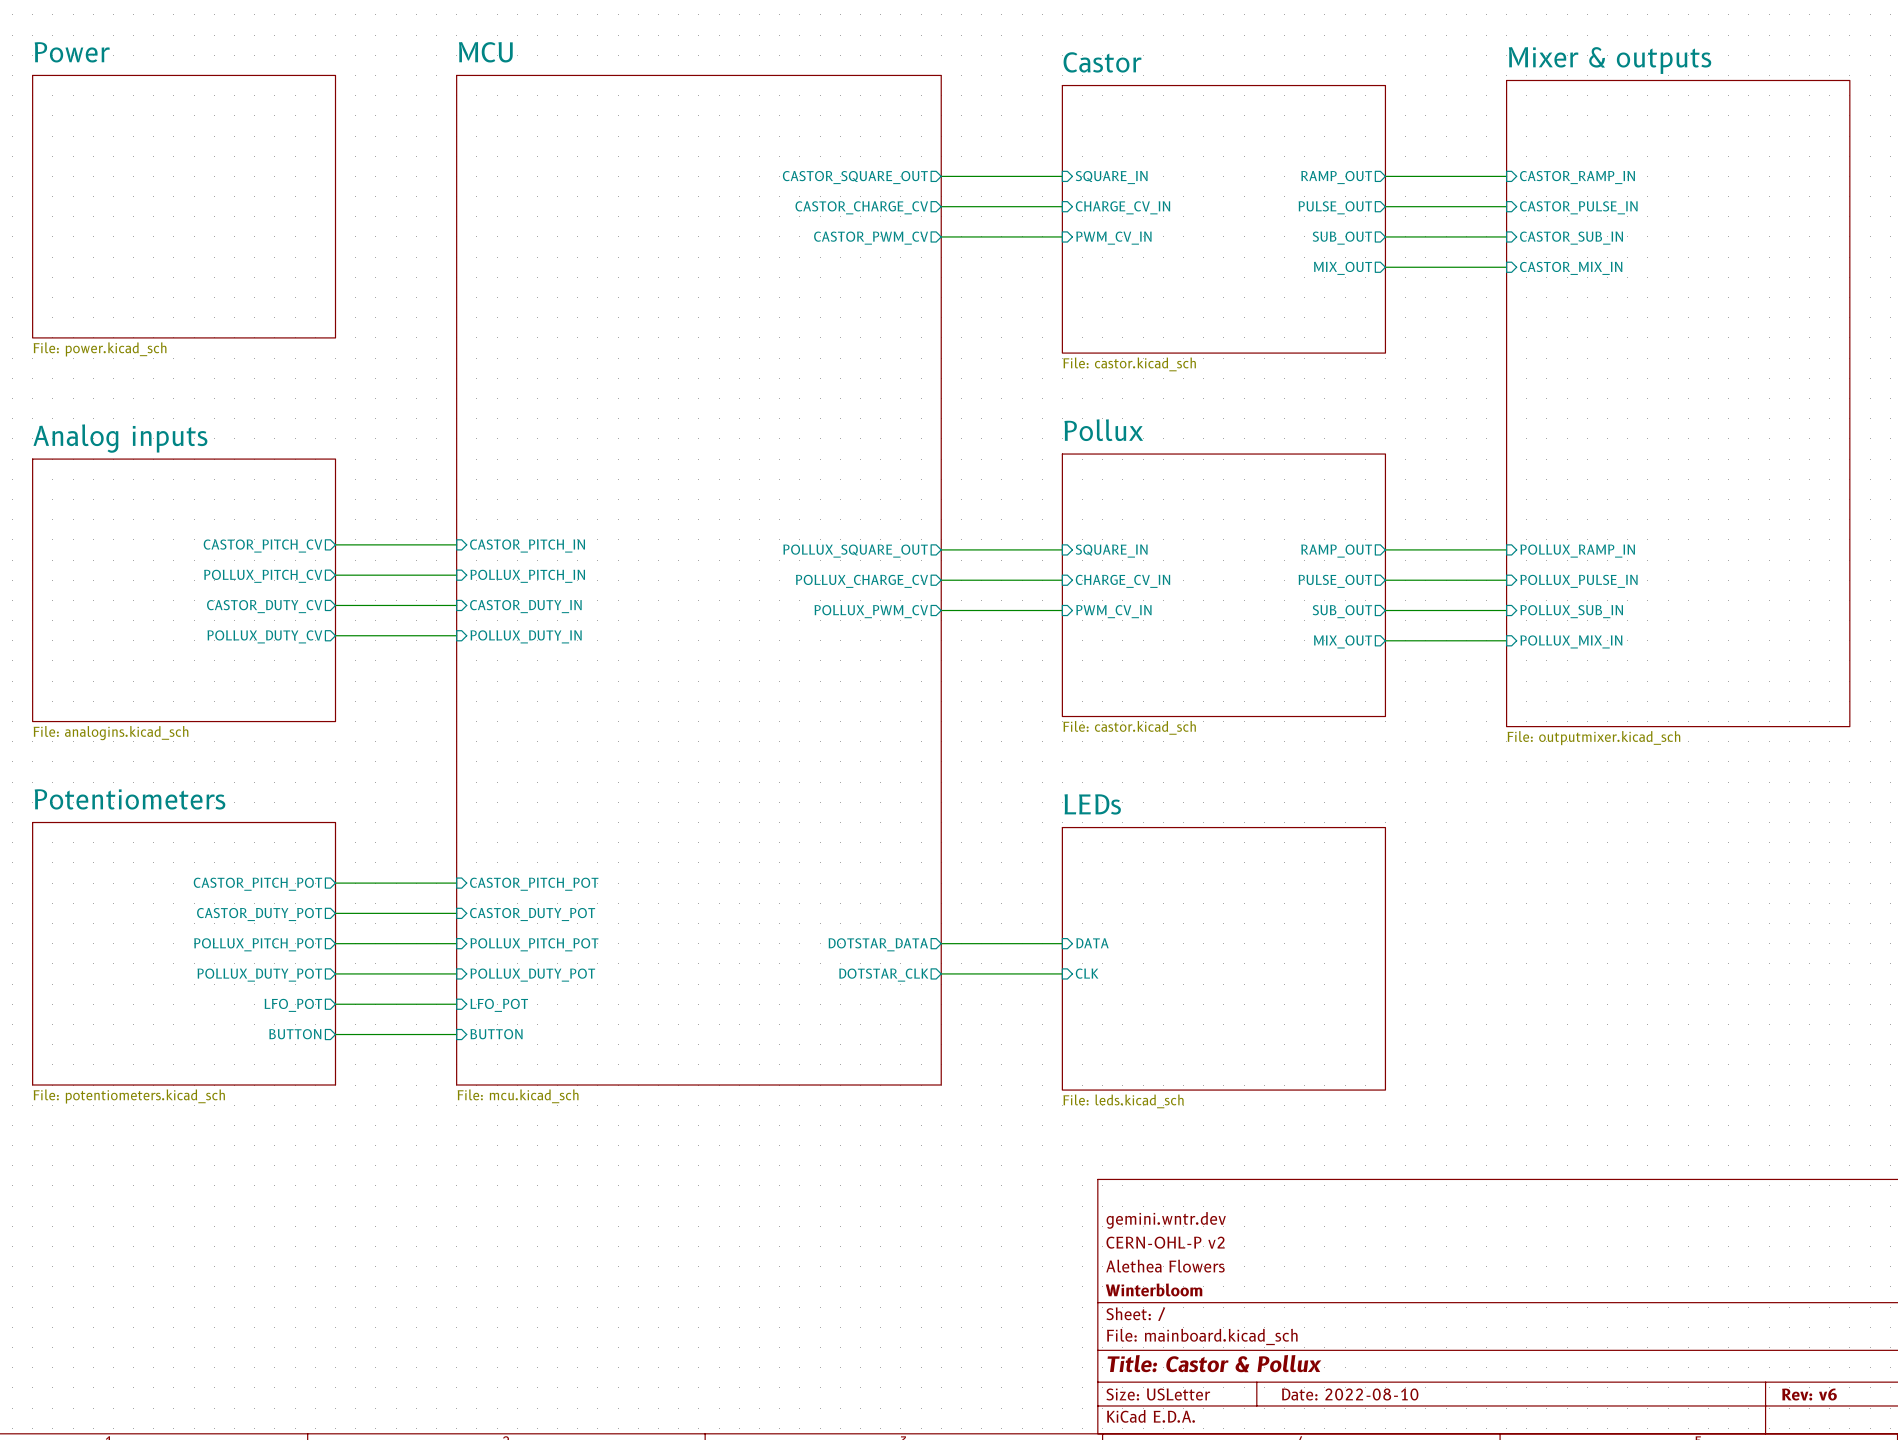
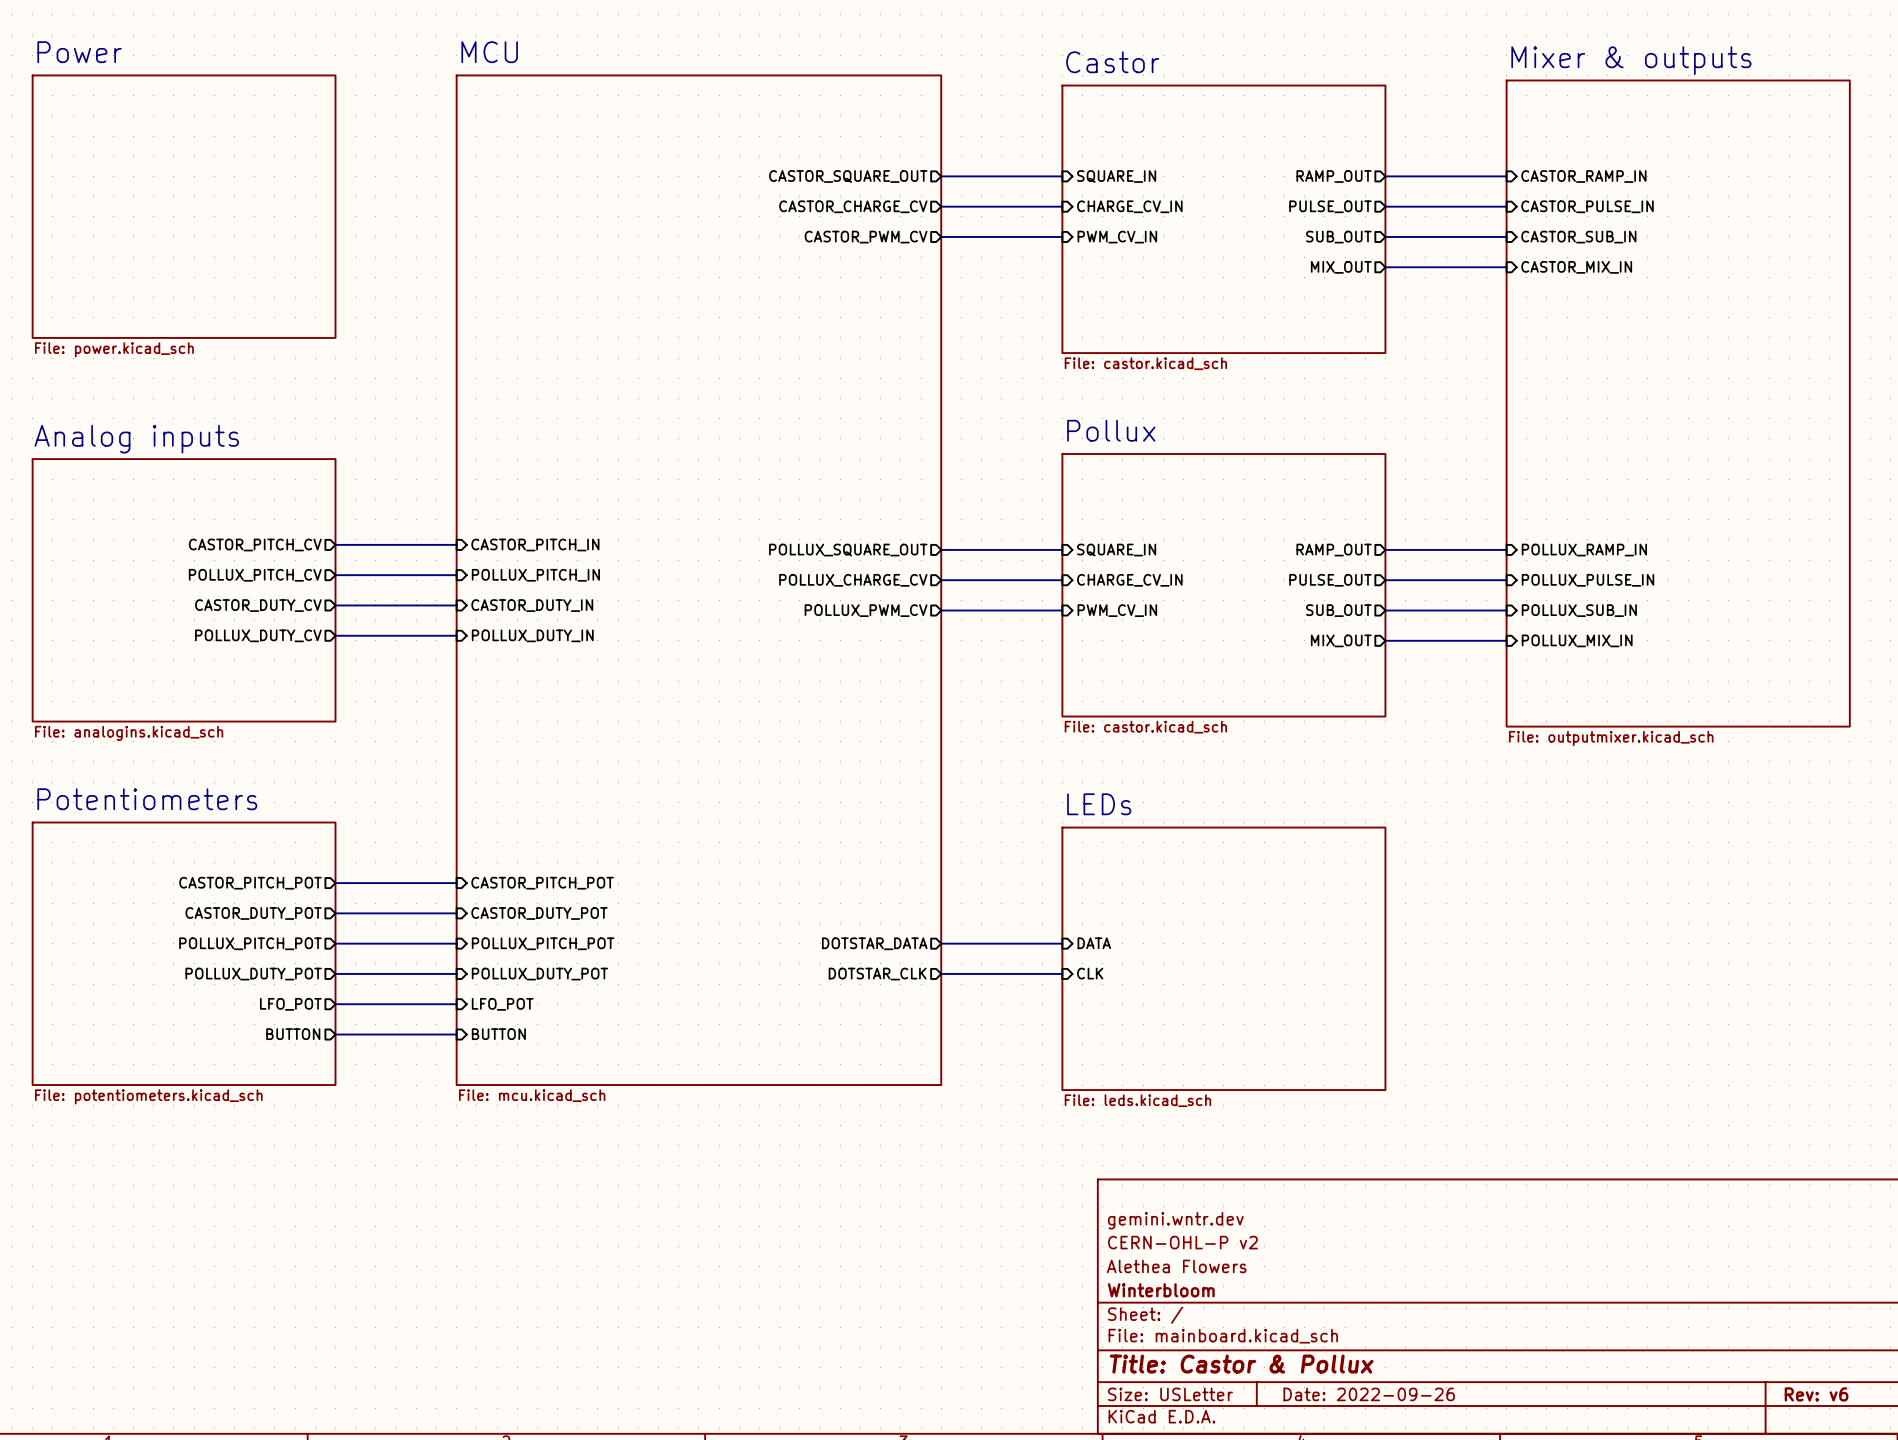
title block: Date: 2022-08-10 (1350, 1394) -> Date: 2022-09-26 (1369, 1394)

